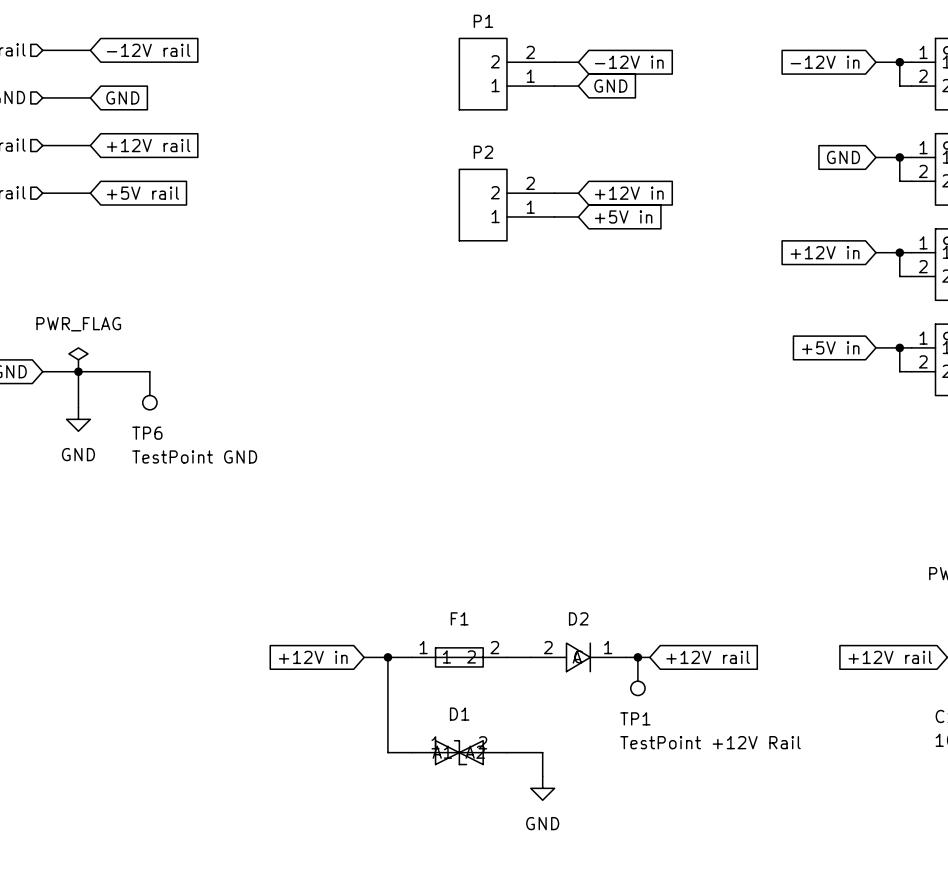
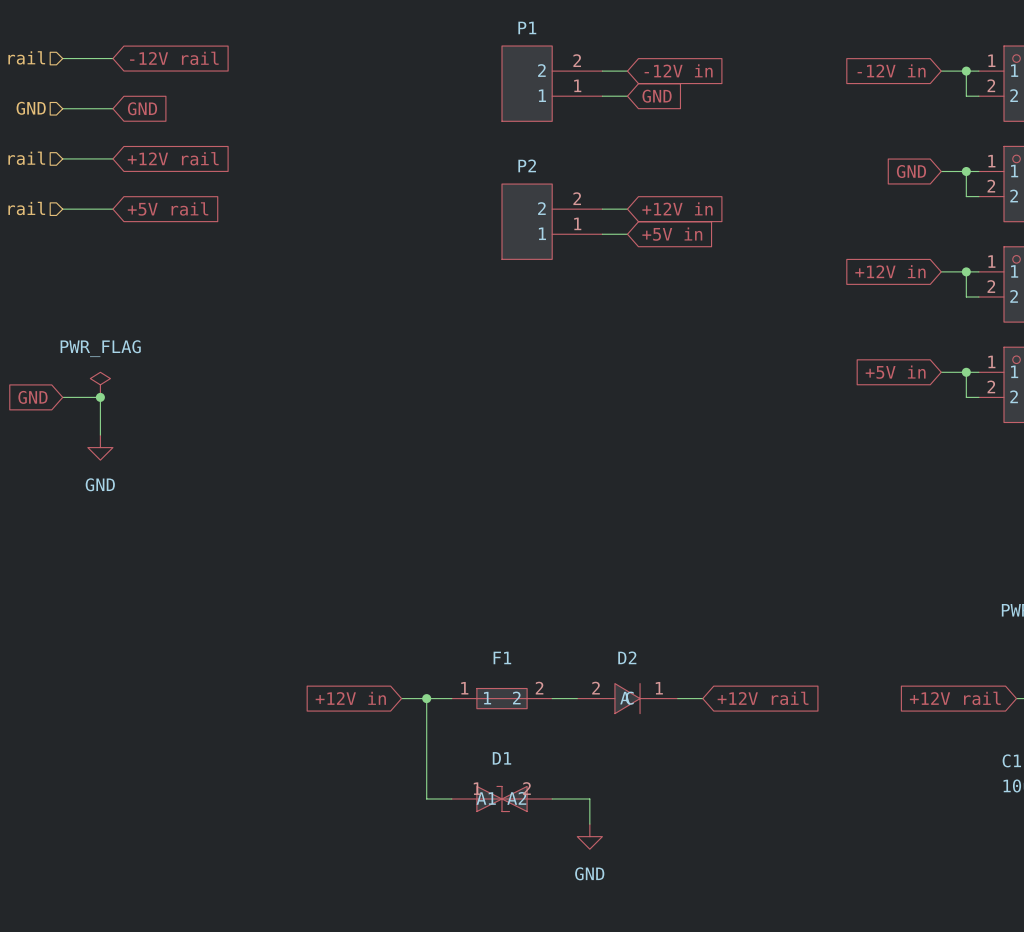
wire: (78, 371) (149, 371) -> none
TP6: TestPoint GND (149, 390) -> none
junction: (637, 657) -> none
TP1: TestPoint +12V Rail (637, 676) -> none

